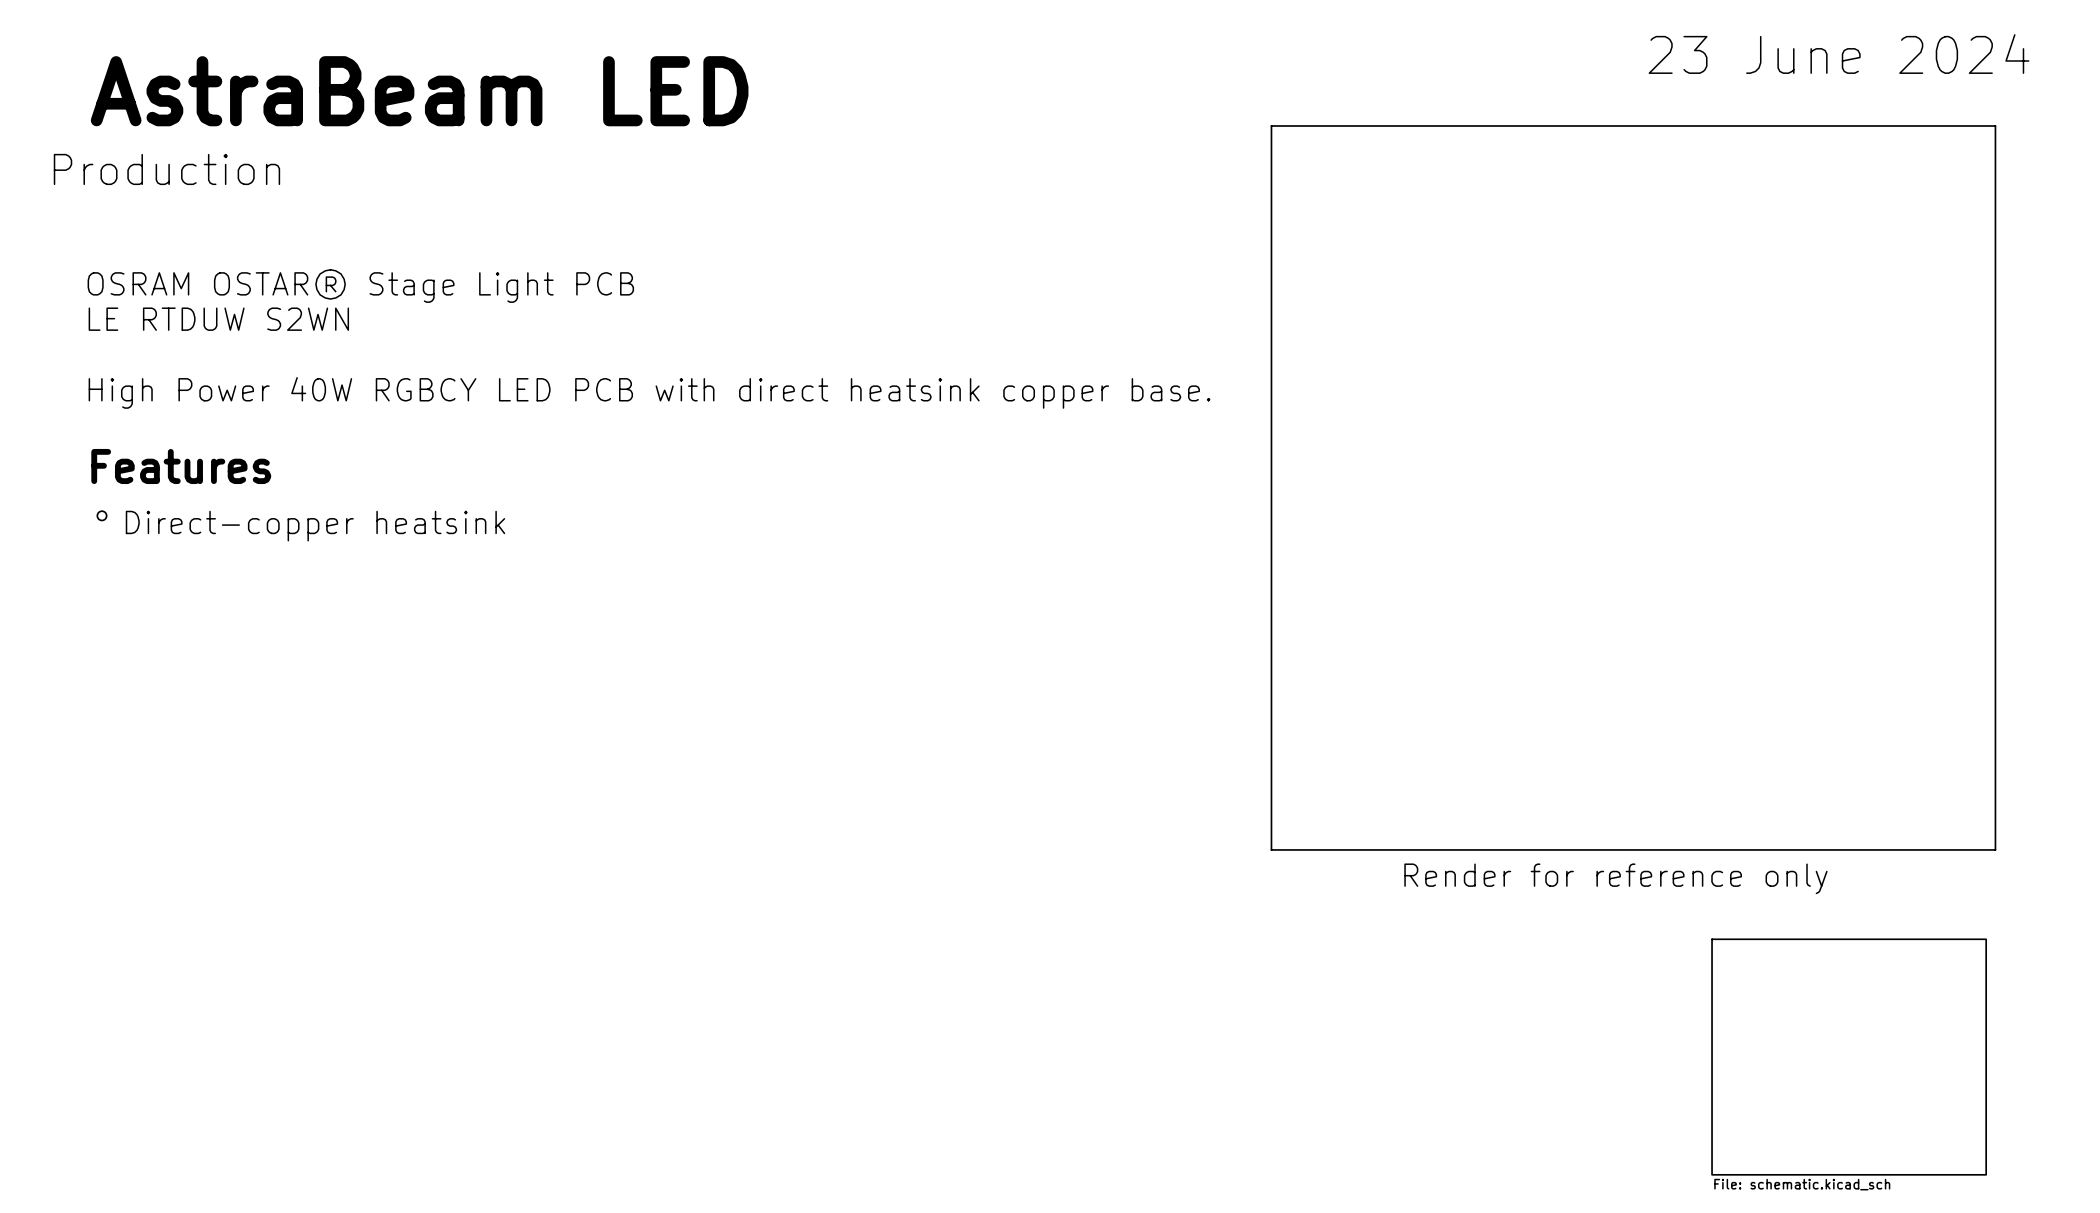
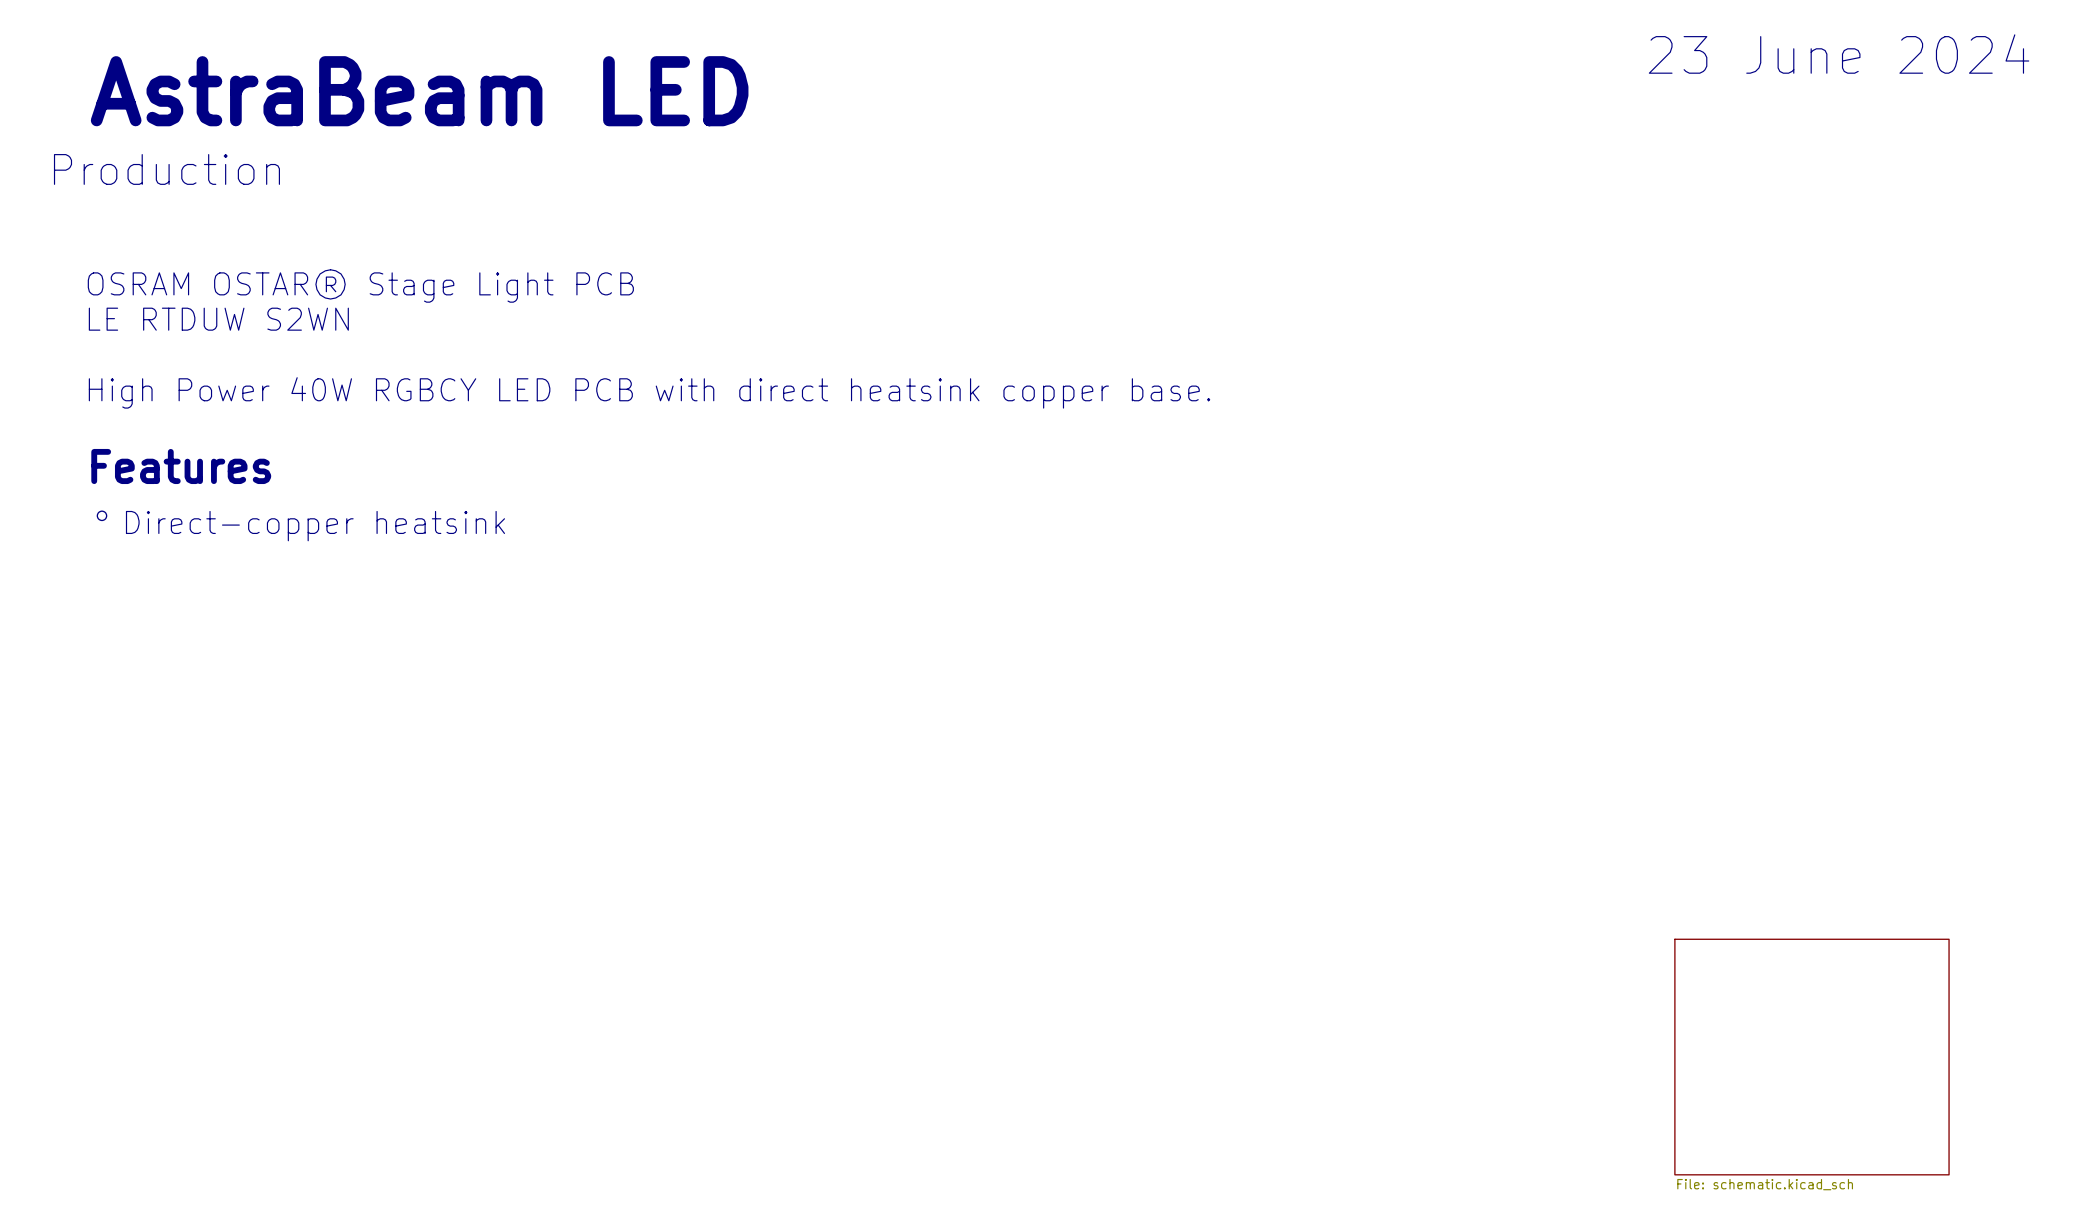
line: (1271, 125) (1995, 125) (1995, 849) (1271, 849) (1271, 125) -> none
text: Render for reference only (1615, 878) -> none
sheet position: (1849, 1057) -> (1811, 1057)

